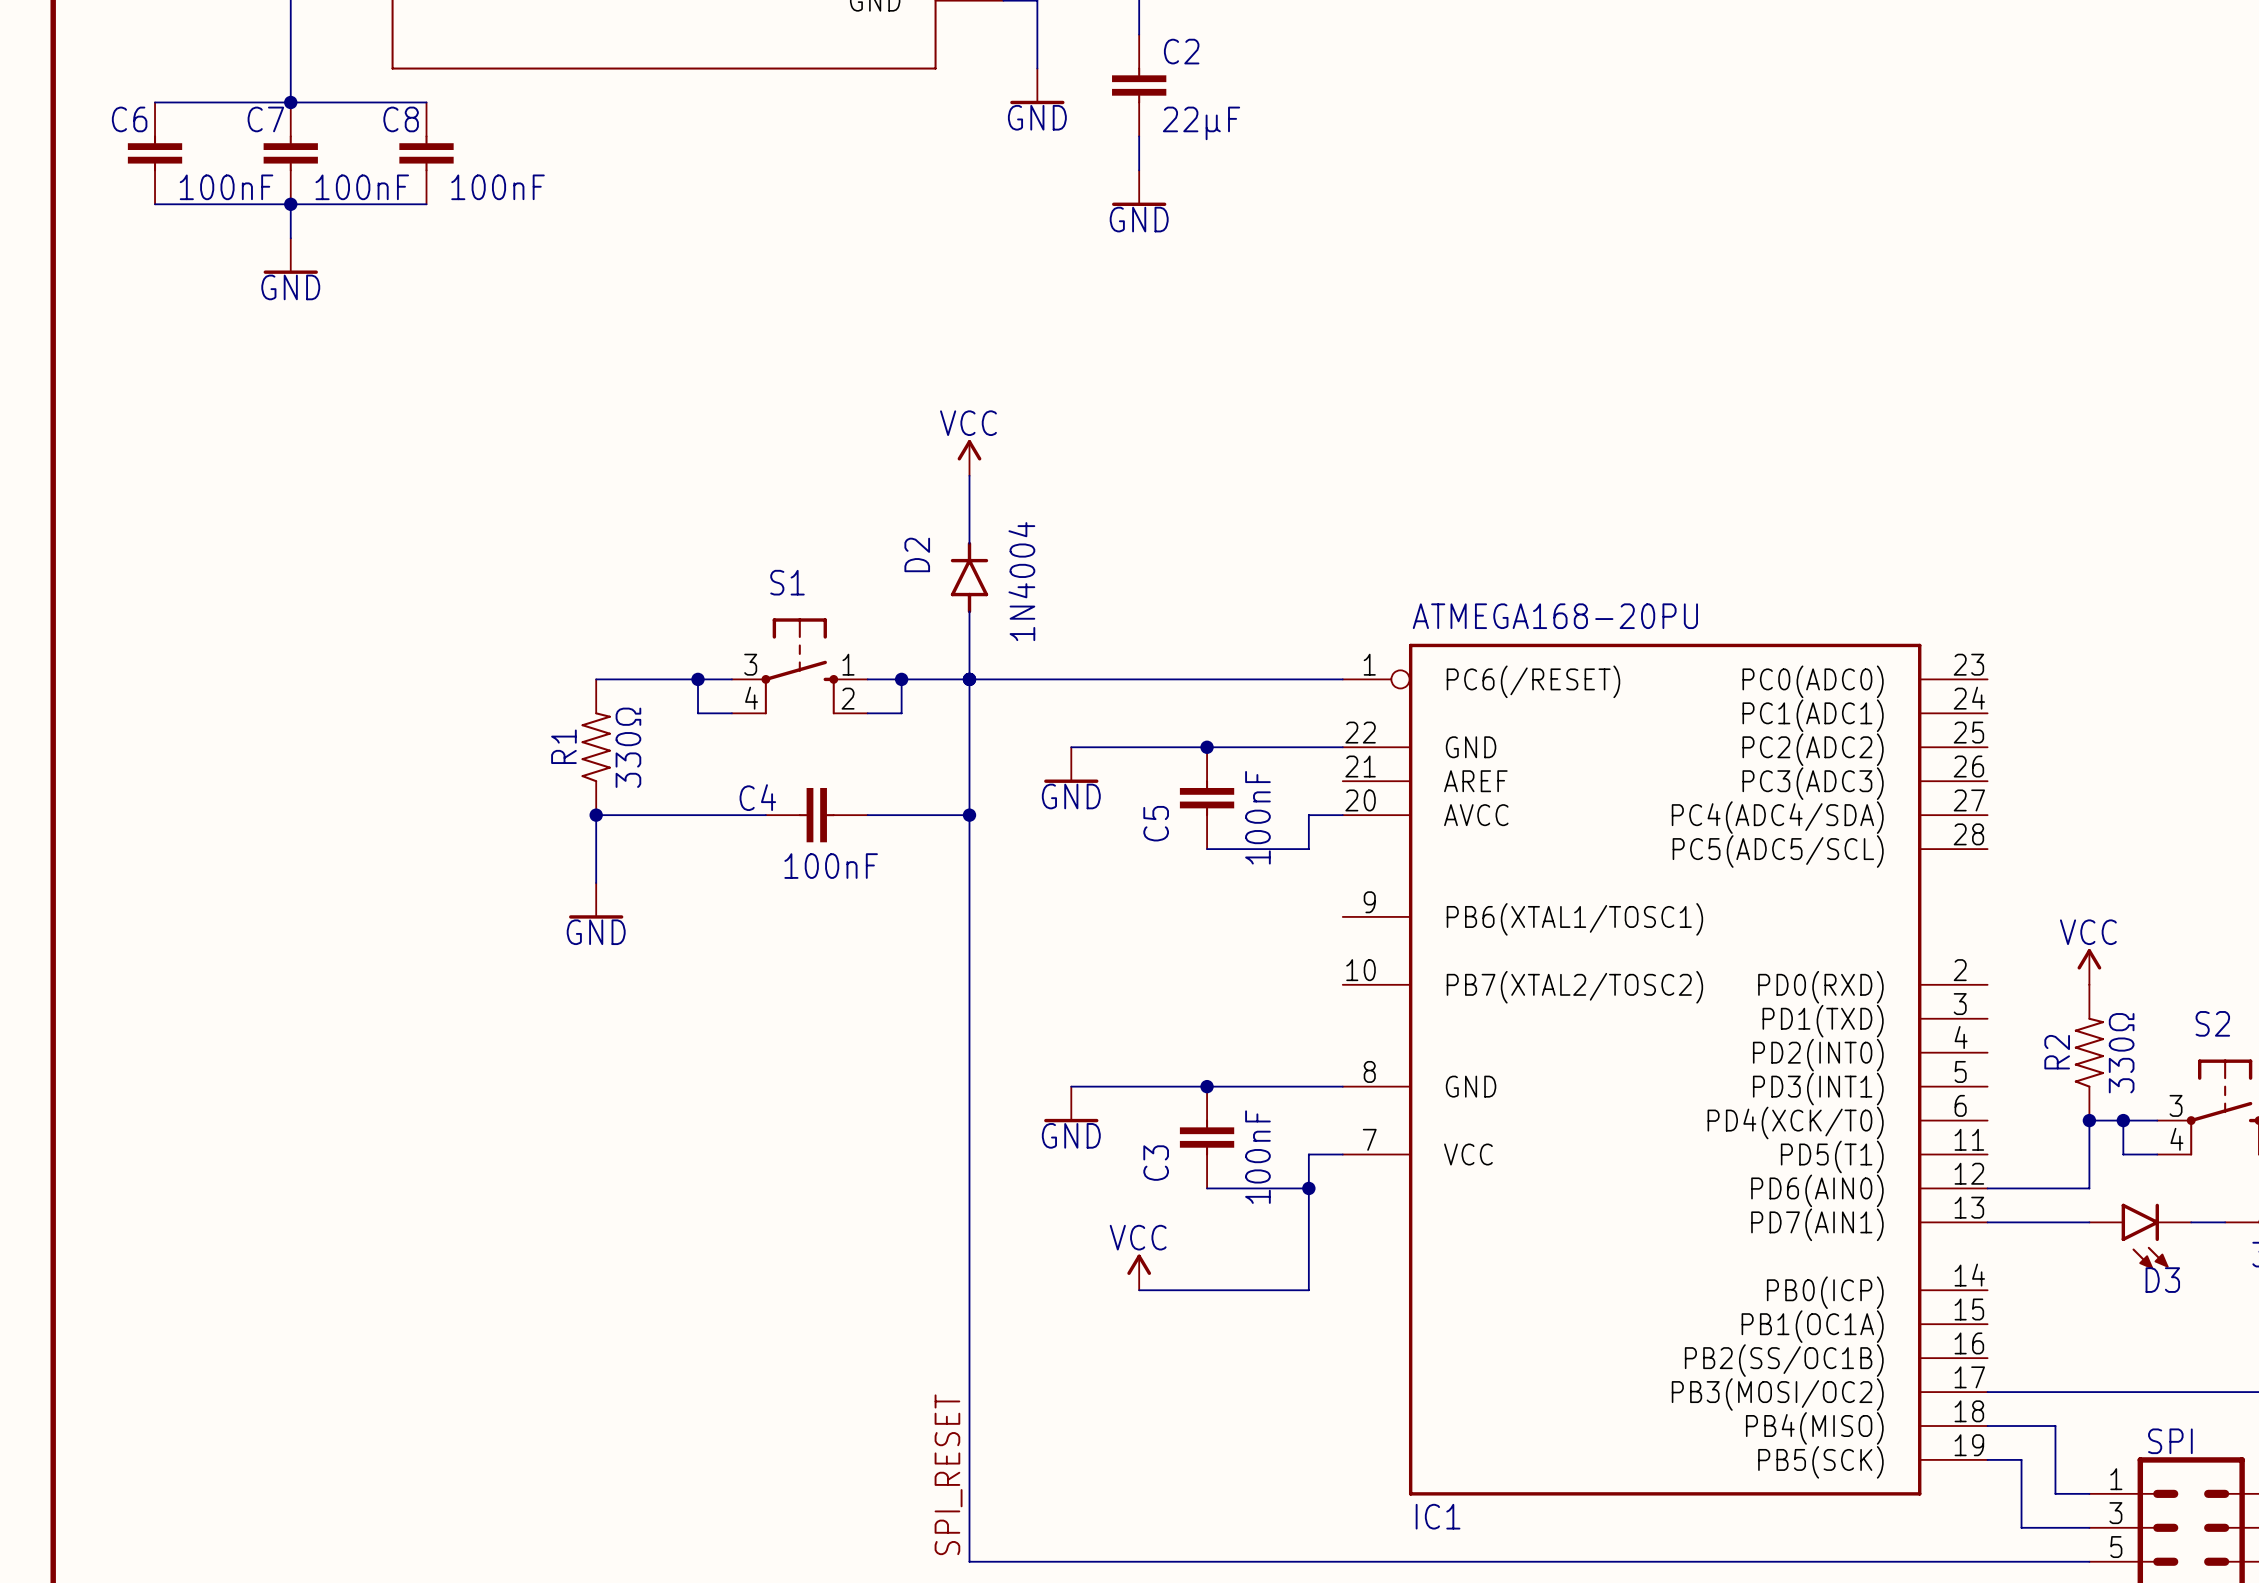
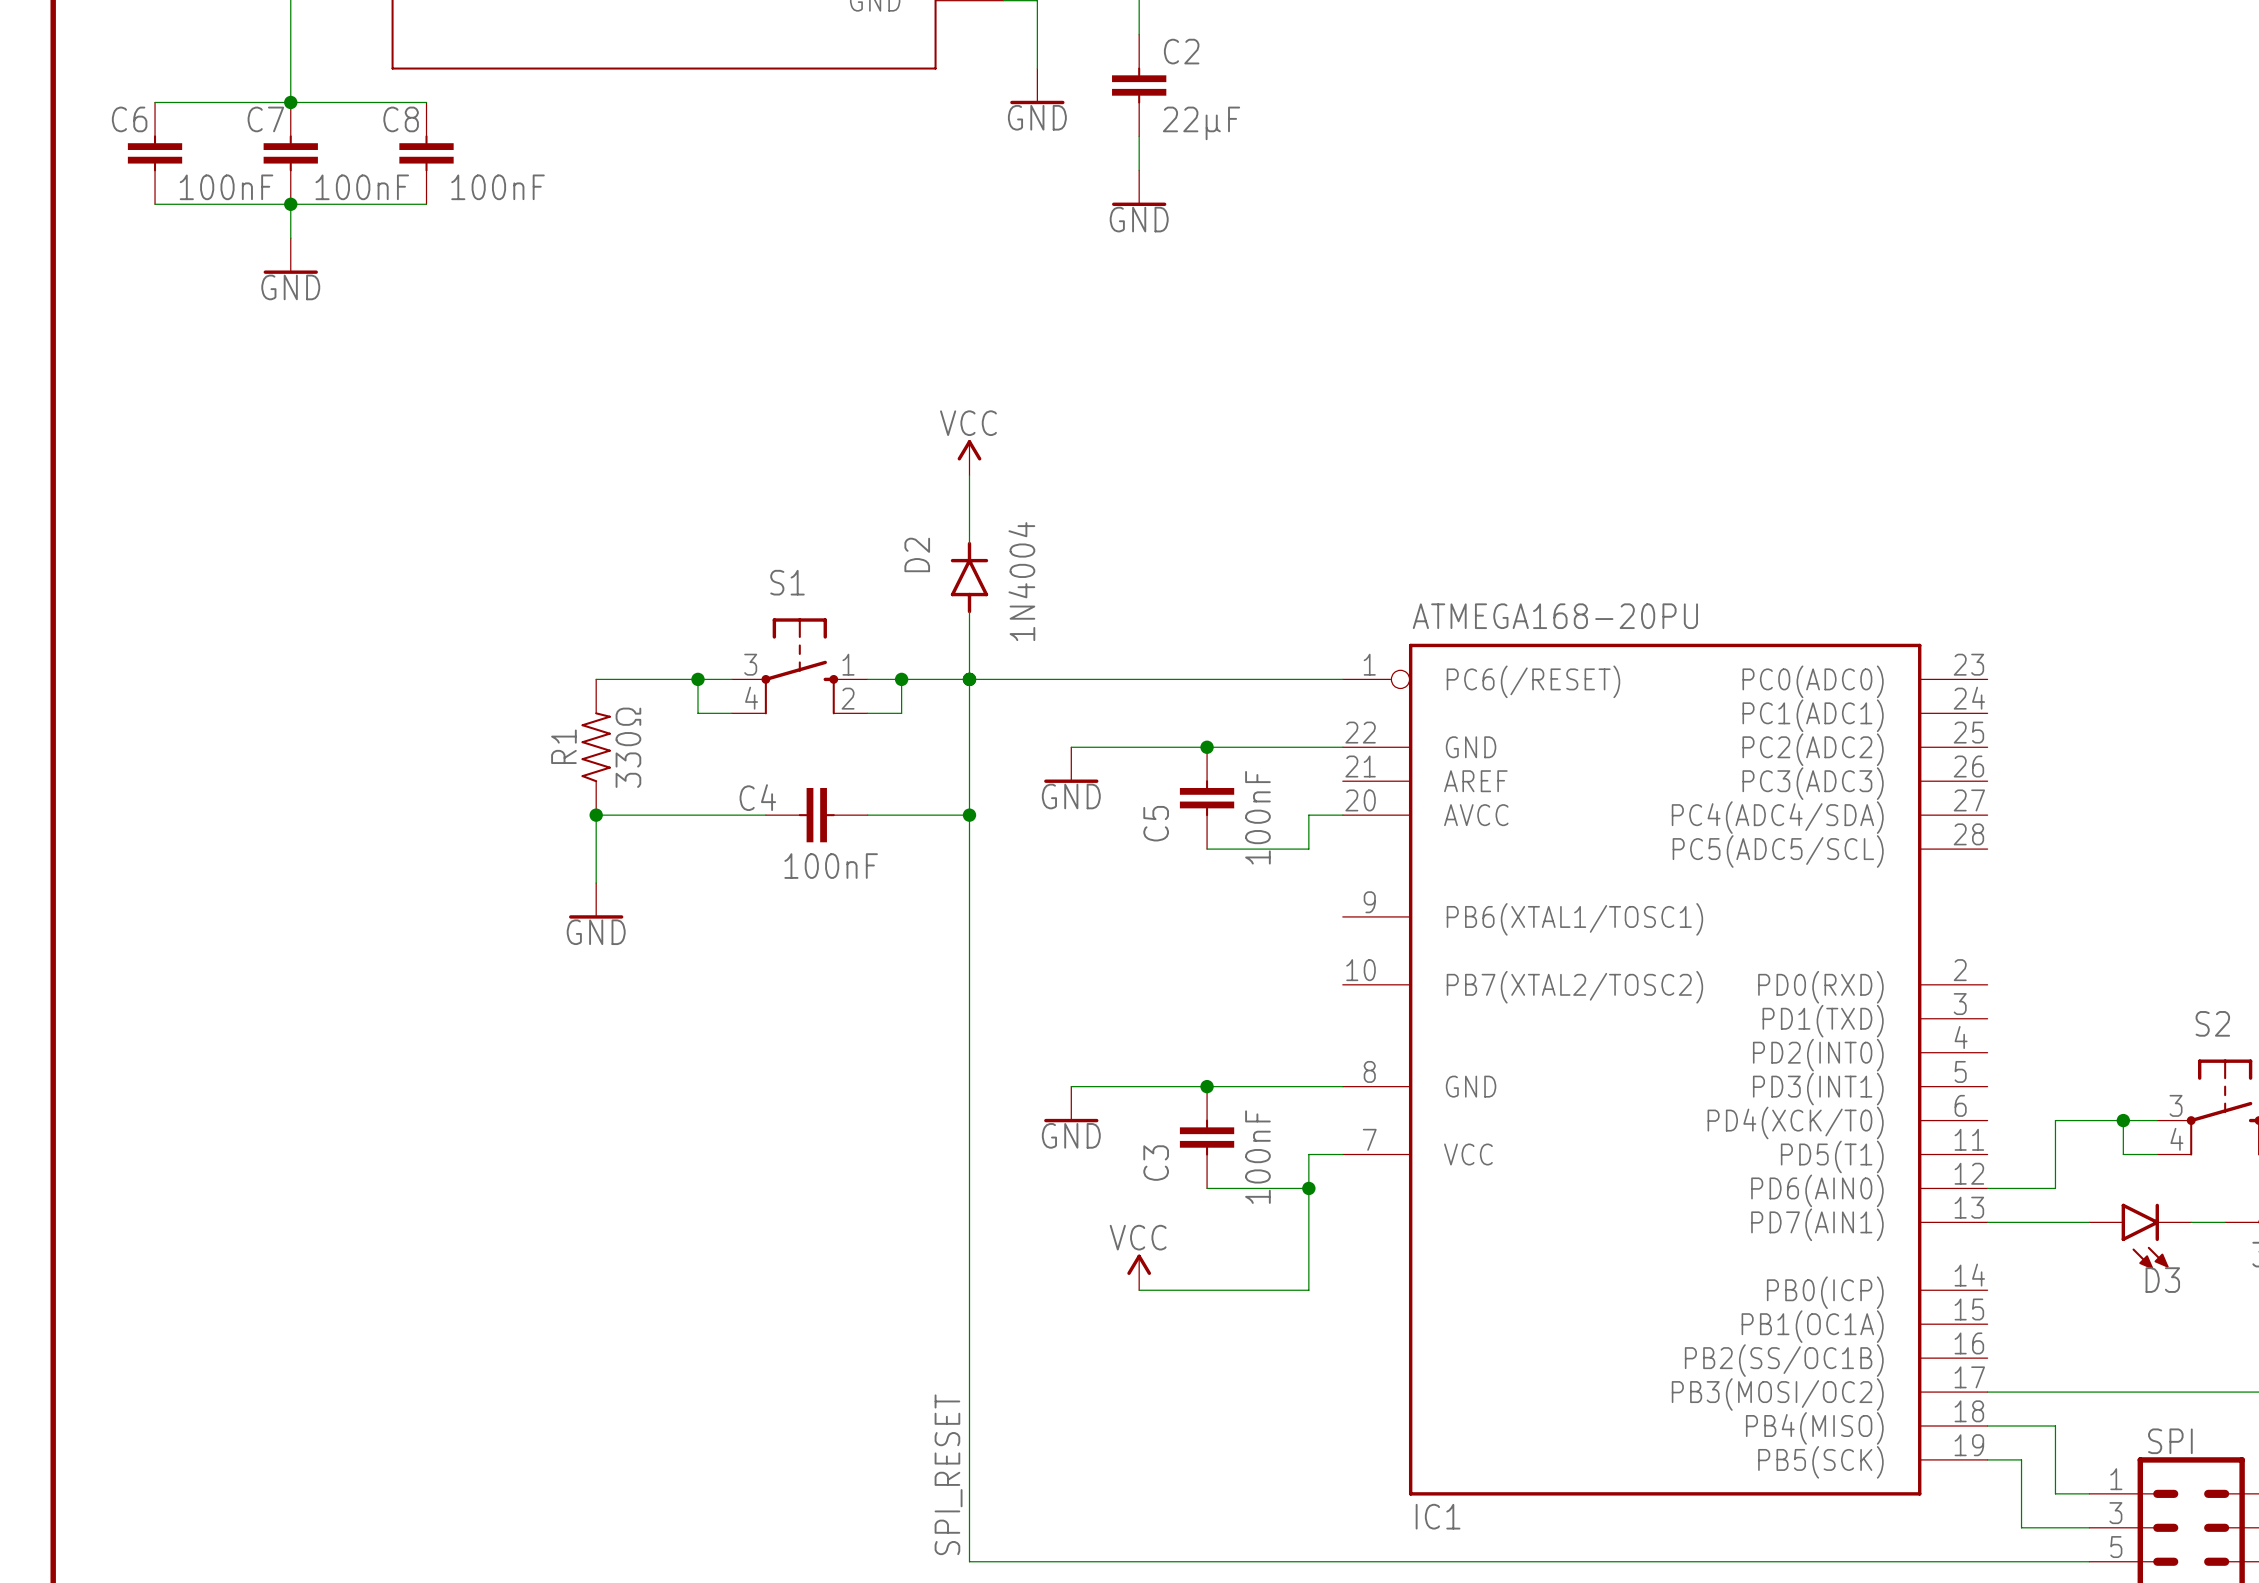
power symbol: VCC (2089, 967) -> none
R2: 330Ω (2089, 1052) -> none
wire: (2089, 1120) (2089, 1188) (2055, 1188) -> (2089, 1120) (2055, 1120) (2055, 1188)
junction: (2089, 1120) -> none

